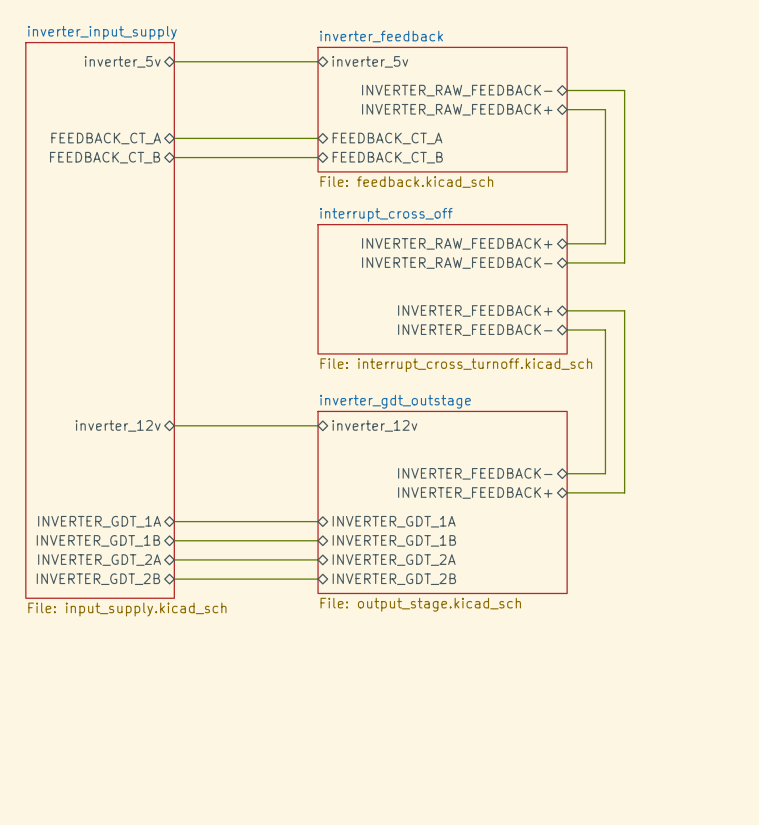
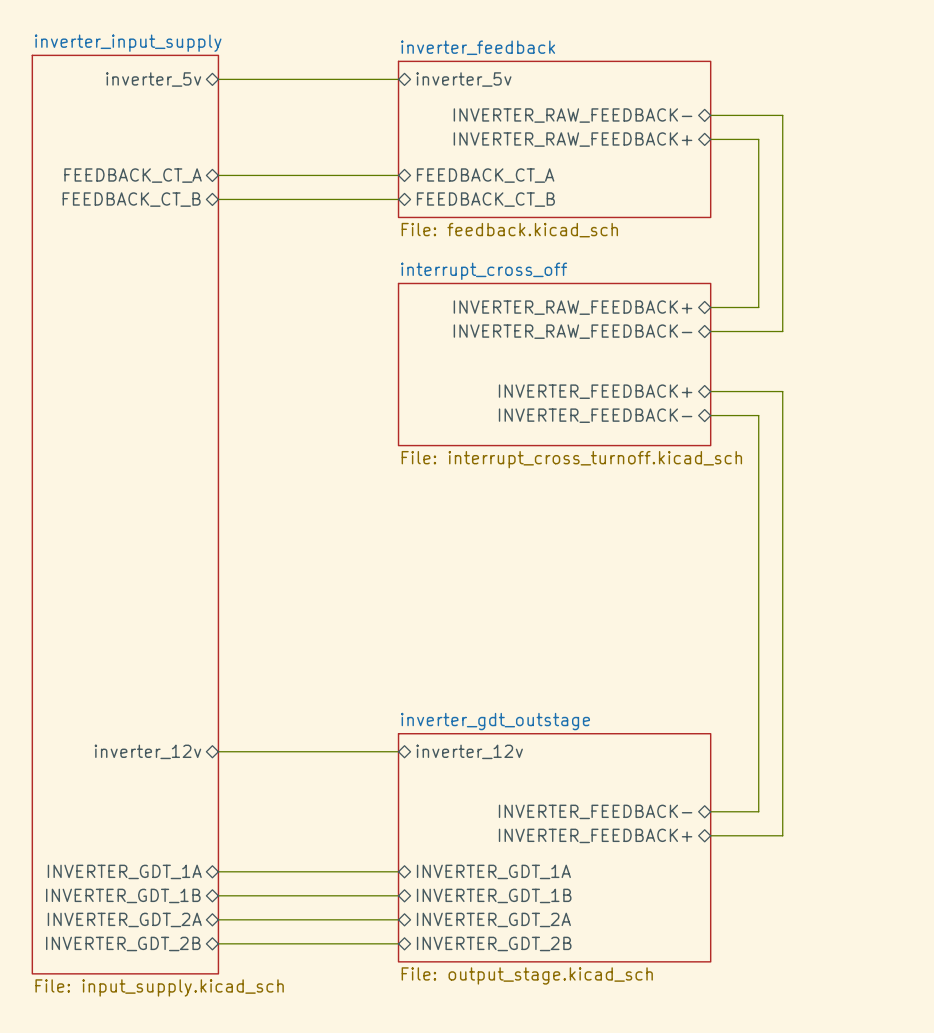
sheet inverter_input_supply: File: input_supply.kicad_sch (100, 320) -> none
sheet inverter_input_supply: none -> File: input_supply.kicad_sch (125, 514)
sheet pin: inverter_12v (118, 425) -> none
wire: (174, 425) (318, 425) -> (218, 751) (398, 751)
sheet pin: inverter_12v (374, 425) -> none
sheet pin position: INVERTER_FEEDBACK- (475, 473) -> INVERTER_FEEDBACK- (595, 811)
wire: (567, 473) (605, 473) -> (710, 811) (758, 811) (758, 595)
sheet pin position: INVERTER_FEEDBACK+ (475, 492) -> INVERTER_FEEDBACK+ (595, 835)
wire: (567, 492) (624, 492) -> (710, 835) (782, 835) (782, 619)
sheet inverter_gdt_outstage position: (442, 502) -> (554, 847)
sheet pin: INVERTER_GDT_1A (99, 521) -> none
wire: (174, 521) (318, 521) -> (218, 871) (398, 871)
sheet pin: INVERTER_GDT_1A (394, 521) -> none
sheet pin: INVERTER_GDT_1B (98, 540) -> none
wire: (174, 540) (318, 540) -> (218, 895) (398, 895)
sheet pin: INVERTER_GDT_1B (394, 540) -> none
wire: (174, 559) (318, 559) -> (218, 919) (398, 919)
sheet pin: INVERTER_GDT_2A (99, 560) -> none
sheet pin: INVERTER_GDT_2A (394, 560) -> none
sheet pin: INVERTER_GDT_2B (98, 579) -> none
wire: (174, 579) (318, 579) -> (218, 943) (398, 943)
sheet pin: INVERTER_GDT_2B (394, 579) -> none
sheet pin: none -> inverter_12v (147, 751)
sheet pin: none -> inverter_12v (469, 751)
sheet pin: none -> INVERTER_GDT_1A (124, 871)
sheet pin: none -> INVERTER_GDT_1A (493, 871)
sheet pin: none -> INVERTER_GDT_1B (123, 895)
sheet pin: none -> INVERTER_GDT_1B (494, 895)
sheet pin: none -> INVERTER_GDT_2A (124, 919)
sheet pin: none -> INVERTER_GDT_2A (493, 919)
sheet pin: none -> INVERTER_GDT_2B (123, 943)
sheet pin: none -> INVERTER_GDT_2B (494, 943)

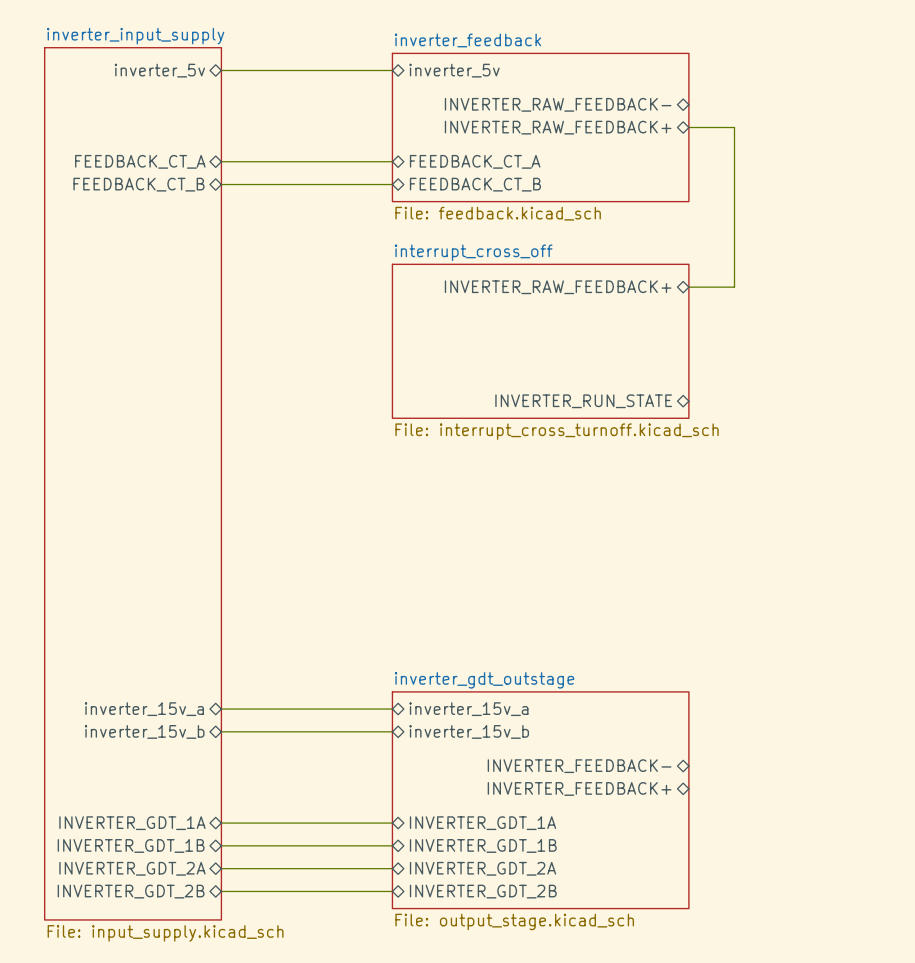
wire: (710, 115) (782, 115) (782, 331) (710, 331) -> none
sheet pin: INVERTER_RAW_FEEDBACK- (573, 331) -> none
sheet pin: INVERTER_FEEDBACK+ (595, 391) -> none
wire: (710, 391) (782, 391) (782, 835) (710, 835) -> none
sheet pin: INVERTER_FEEDBACK- (595, 415) -> none
wire: (710, 415) (758, 415) (758, 811) (710, 811) -> none
sheet pin: none -> INVERTER_RUN_STATE (583, 401)
sheet pin: inverter_12v (147, 751) -> inverter_15v_a (144, 709)
sheet pin: inverter_12v (469, 751) -> inverter_15v_a (468, 709)
sheet pin: none -> inverter_15v_b (144, 731)
wire: none -> (221, 731) (392, 731)
sheet pin: none -> inverter_15v_b (469, 731)

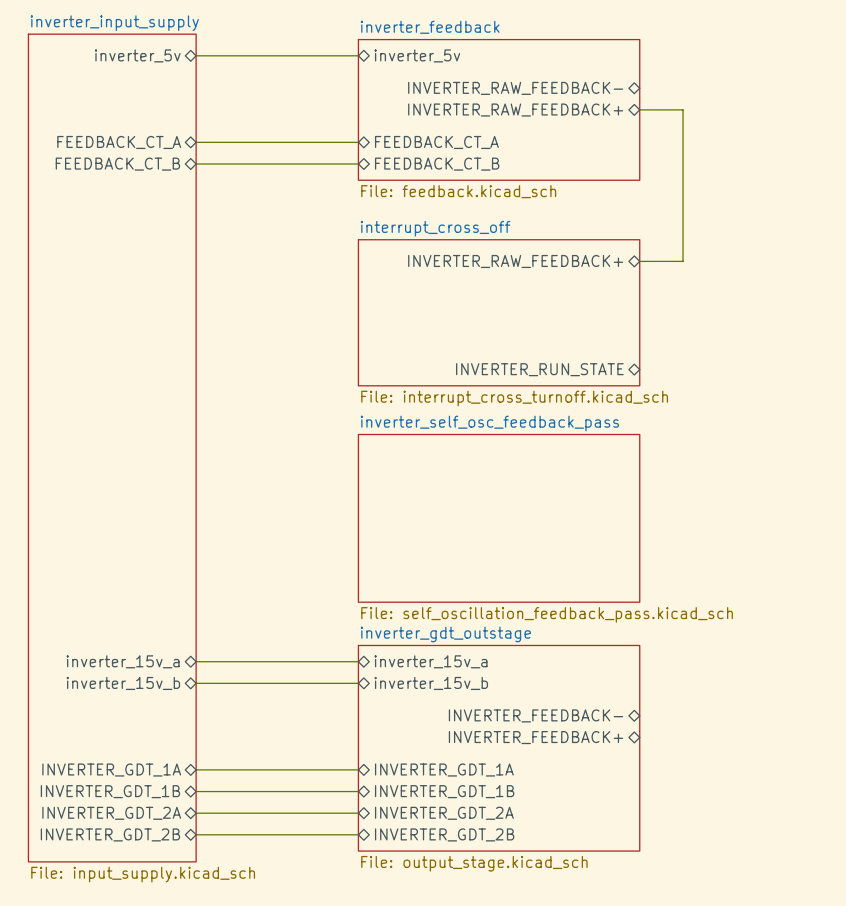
sheet inverter_self_osc_feedback_pass: none -> File: self_oscillation_feedback_pass.kicad_sch (499, 518)

